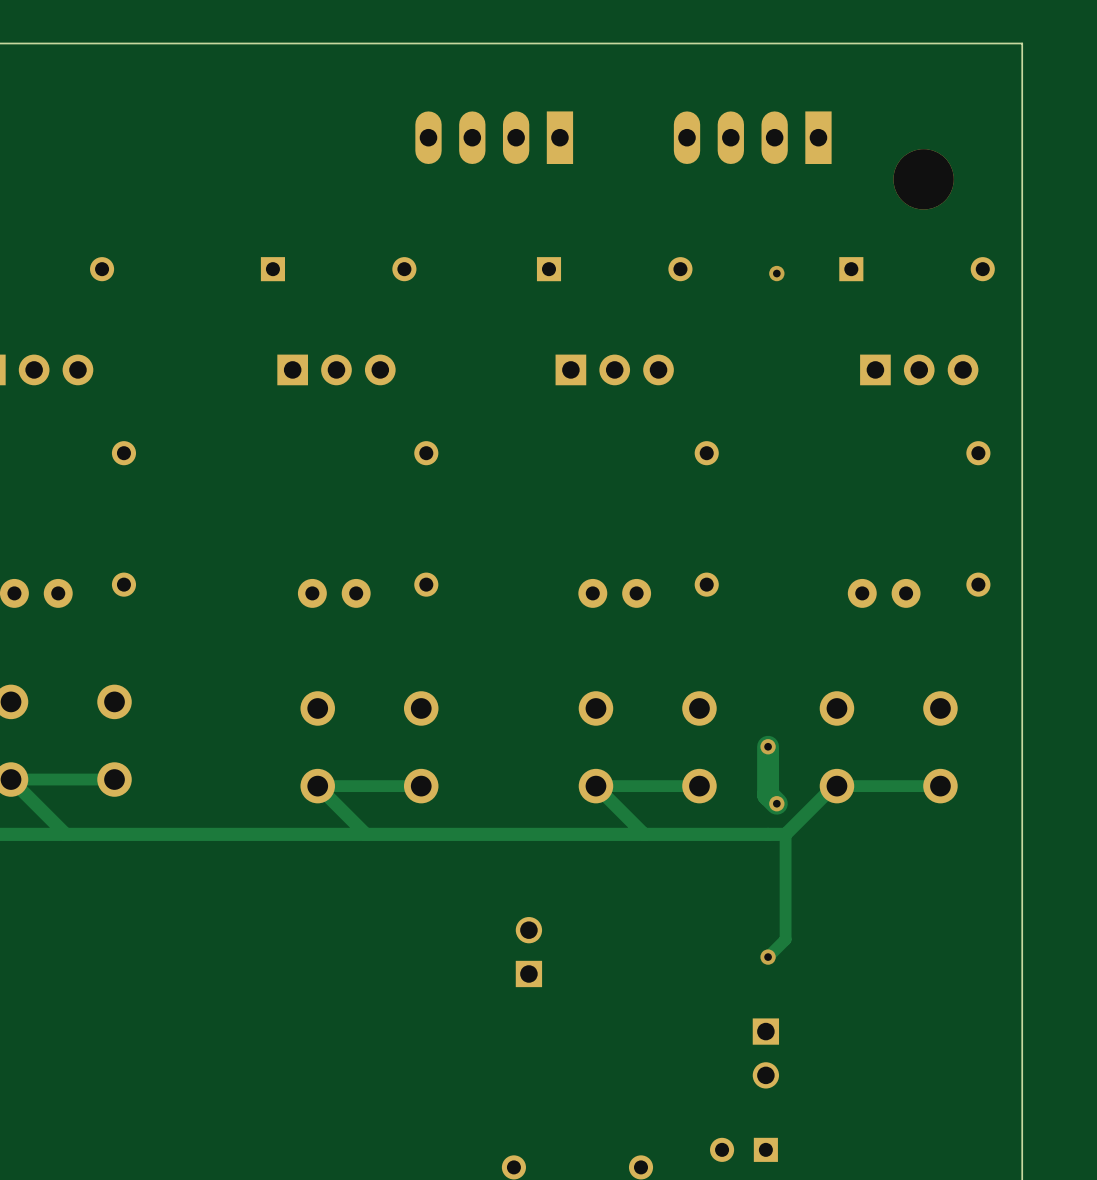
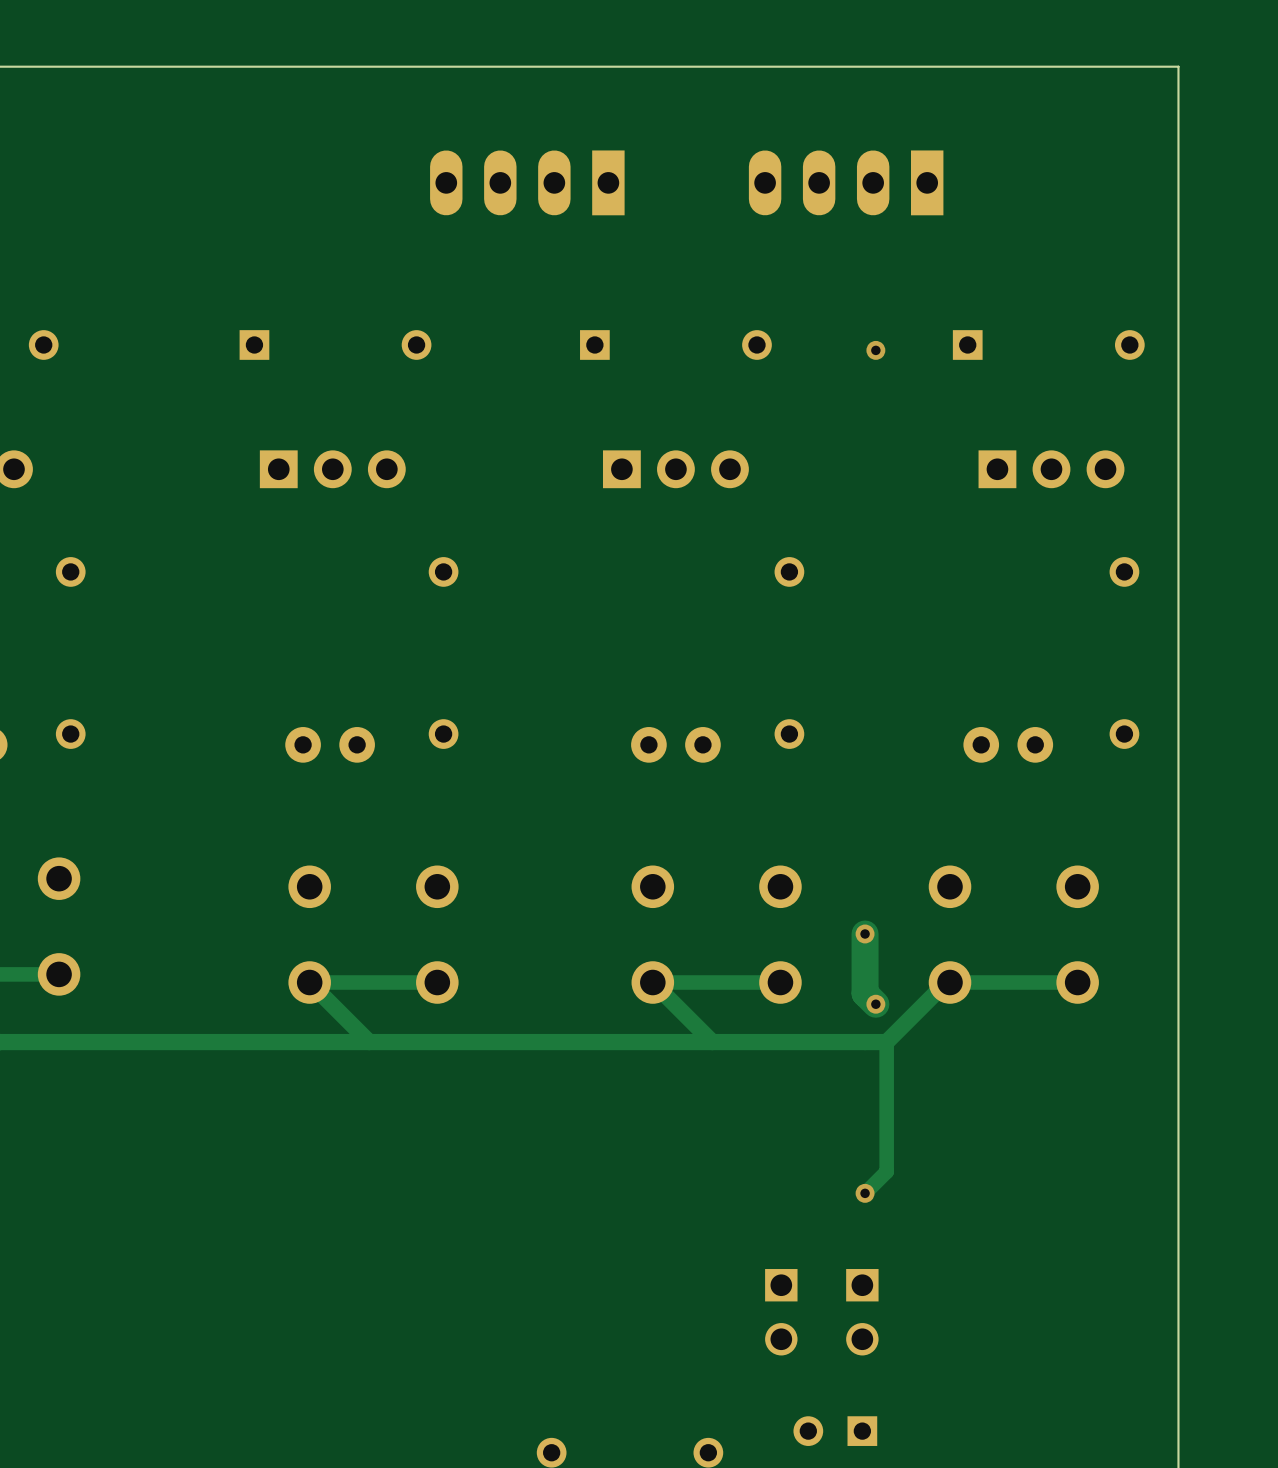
part: (923, 179) -> none
part rotation: 0° (528, 952) -> 180° (781, 1312)
part position: (528, 952) -> (781, 1312)

